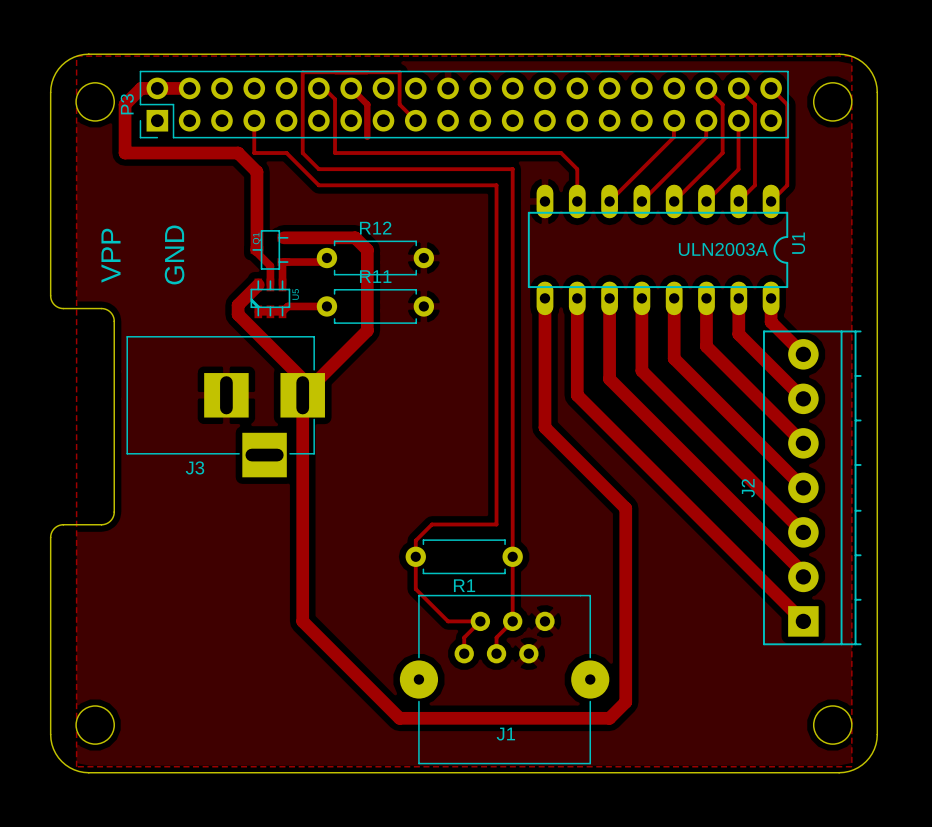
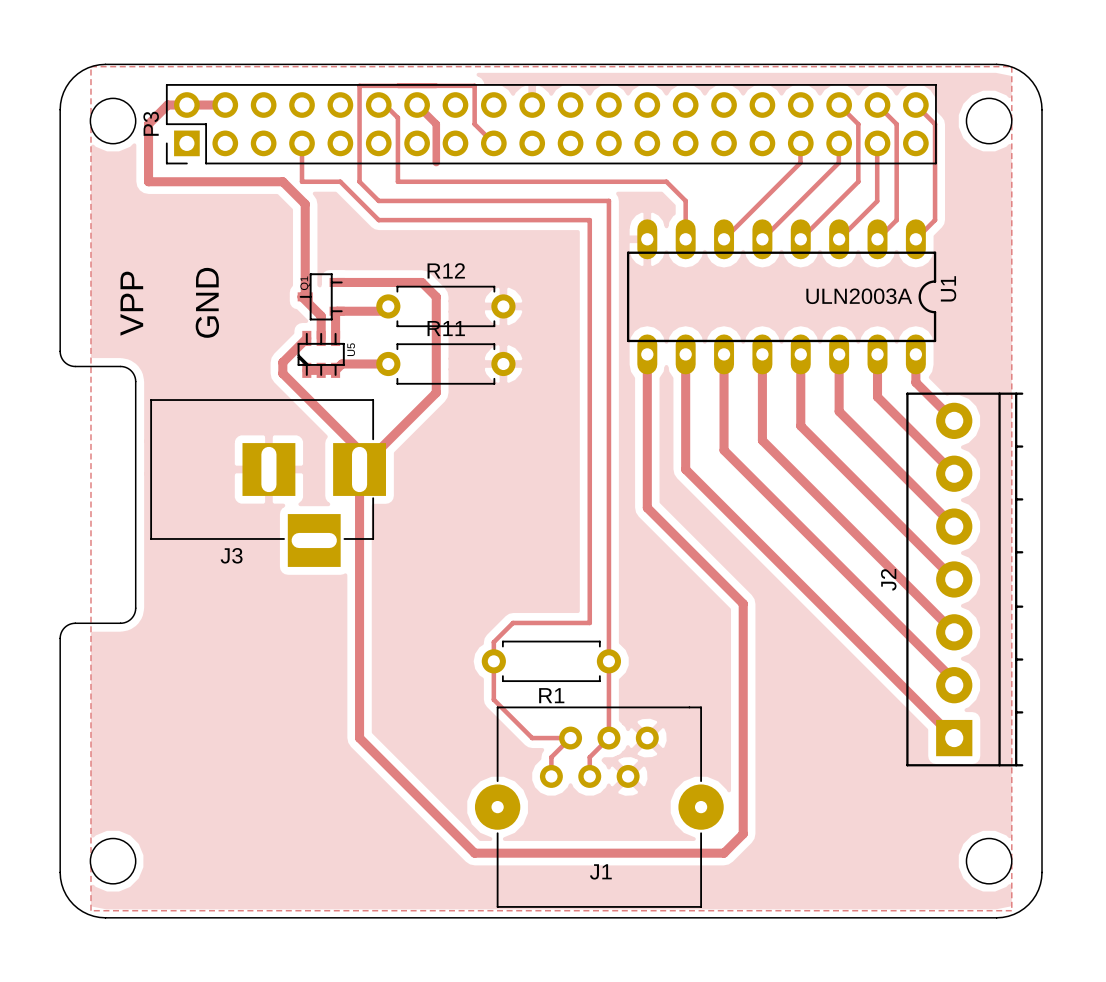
track width: thick (189, 88) (141, 88) (125, 104) (125, 153) (238, 153) (256, 171) (256, 249) -> thin (225, 105) (167, 105) (148, 124) (148, 181) (282, 181) (305, 204) (305, 296)
track width: thick (283, 237) (355, 237) (367, 249) (367, 330) (302, 395) (302, 621) (399, 718) (609, 718) (625, 702) (625, 508) (544, 427) (544, 298) -> thin (337, 282) (421, 282) (436, 296) (436, 392) (359, 469) (359, 738) (474, 853) (724, 853) (743, 833) (743, 603) (647, 507) (647, 354)
track width: thick (258, 284) (238, 305) (238, 314) (302, 379) -> thin (306, 338) (282, 362) (282, 373) (359, 450)
track width: thick (577, 298) (577, 395) (803, 621) -> thin (685, 354) (685, 469) (954, 738)
track width: thick (609, 298) (609, 379) (803, 572) -> thin (724, 354) (724, 450) (954, 680)
track width: thick (641, 298) (641, 370) (803, 532) -> thin (762, 354) (762, 440) (954, 632)
track width: thick (674, 298) (674, 358) (803, 487) -> thin (800, 354) (800, 426) (954, 579)
track width: thick (706, 298) (706, 346) (803, 443) -> thin (839, 354) (839, 411) (954, 526)
track width: thick (738, 298) (738, 334) (803, 398) -> thin (877, 354) (877, 397) (954, 473)
track width: thick (771, 298) (771, 322) (803, 354) -> thin (915, 354) (915, 382) (954, 420)

